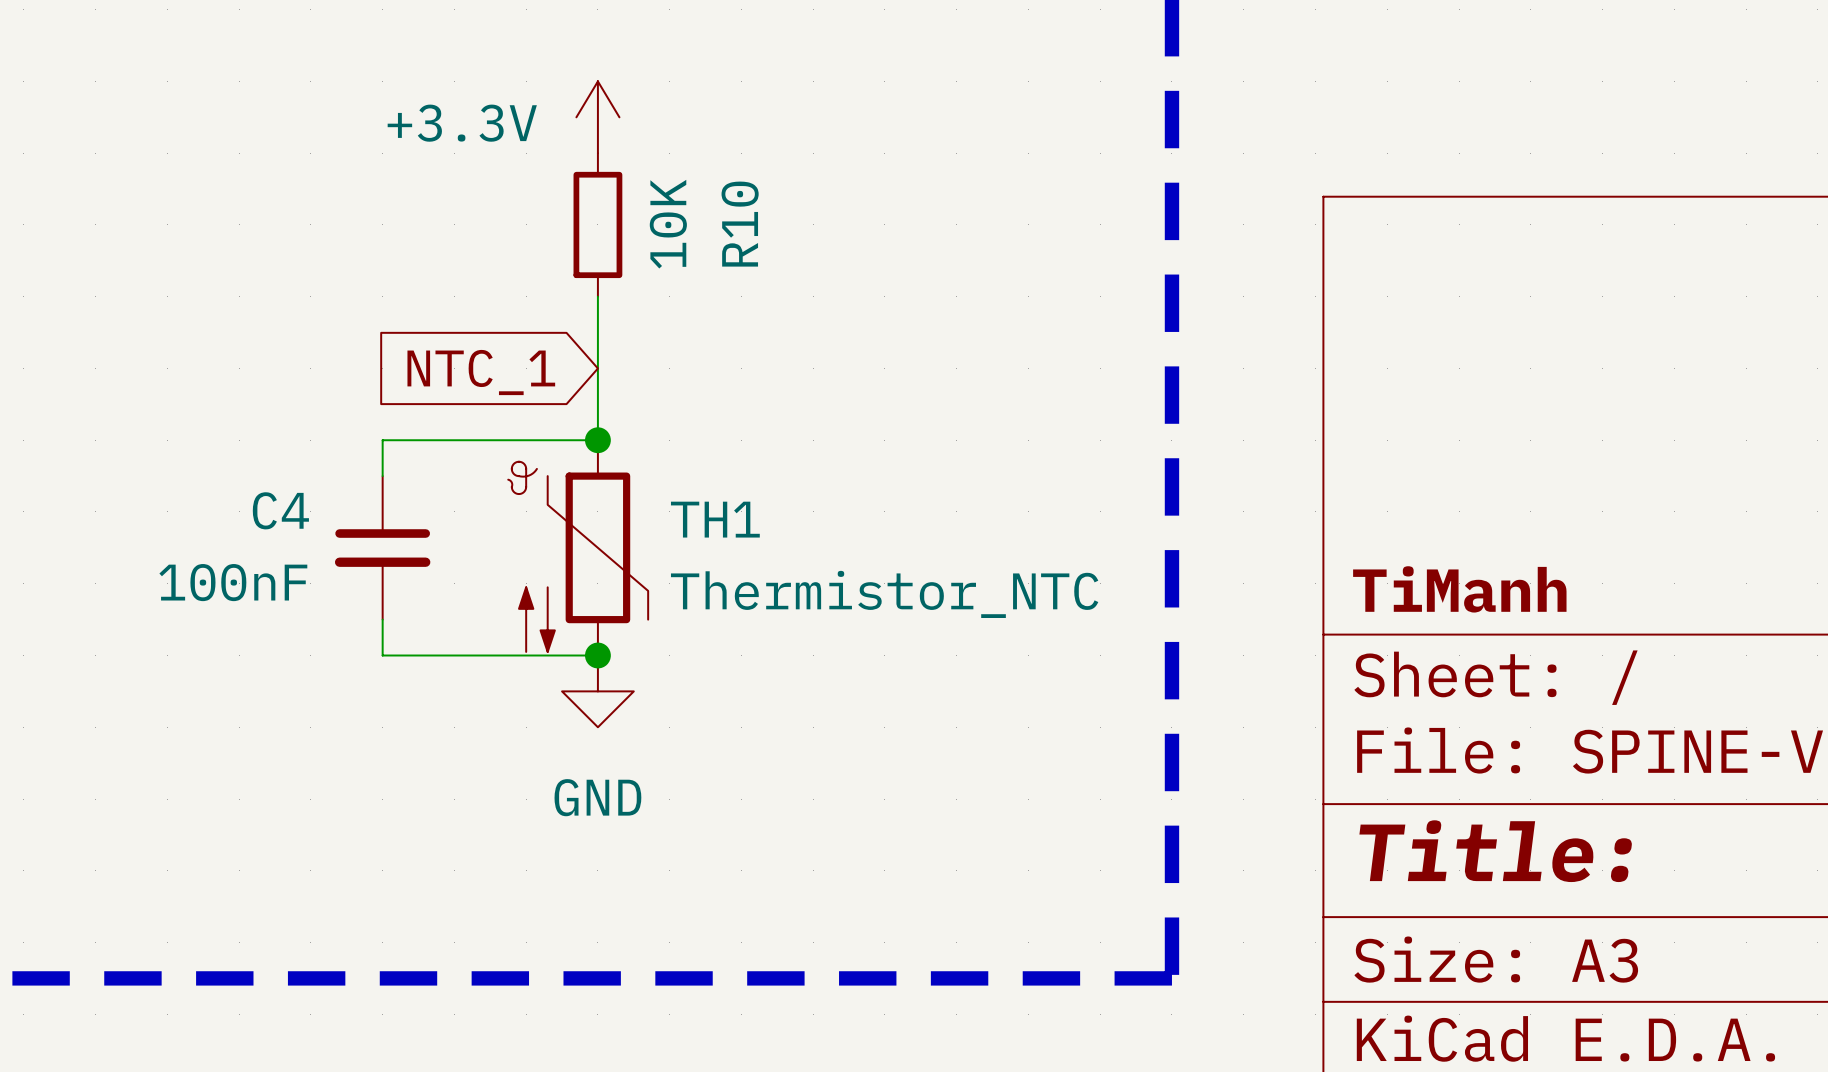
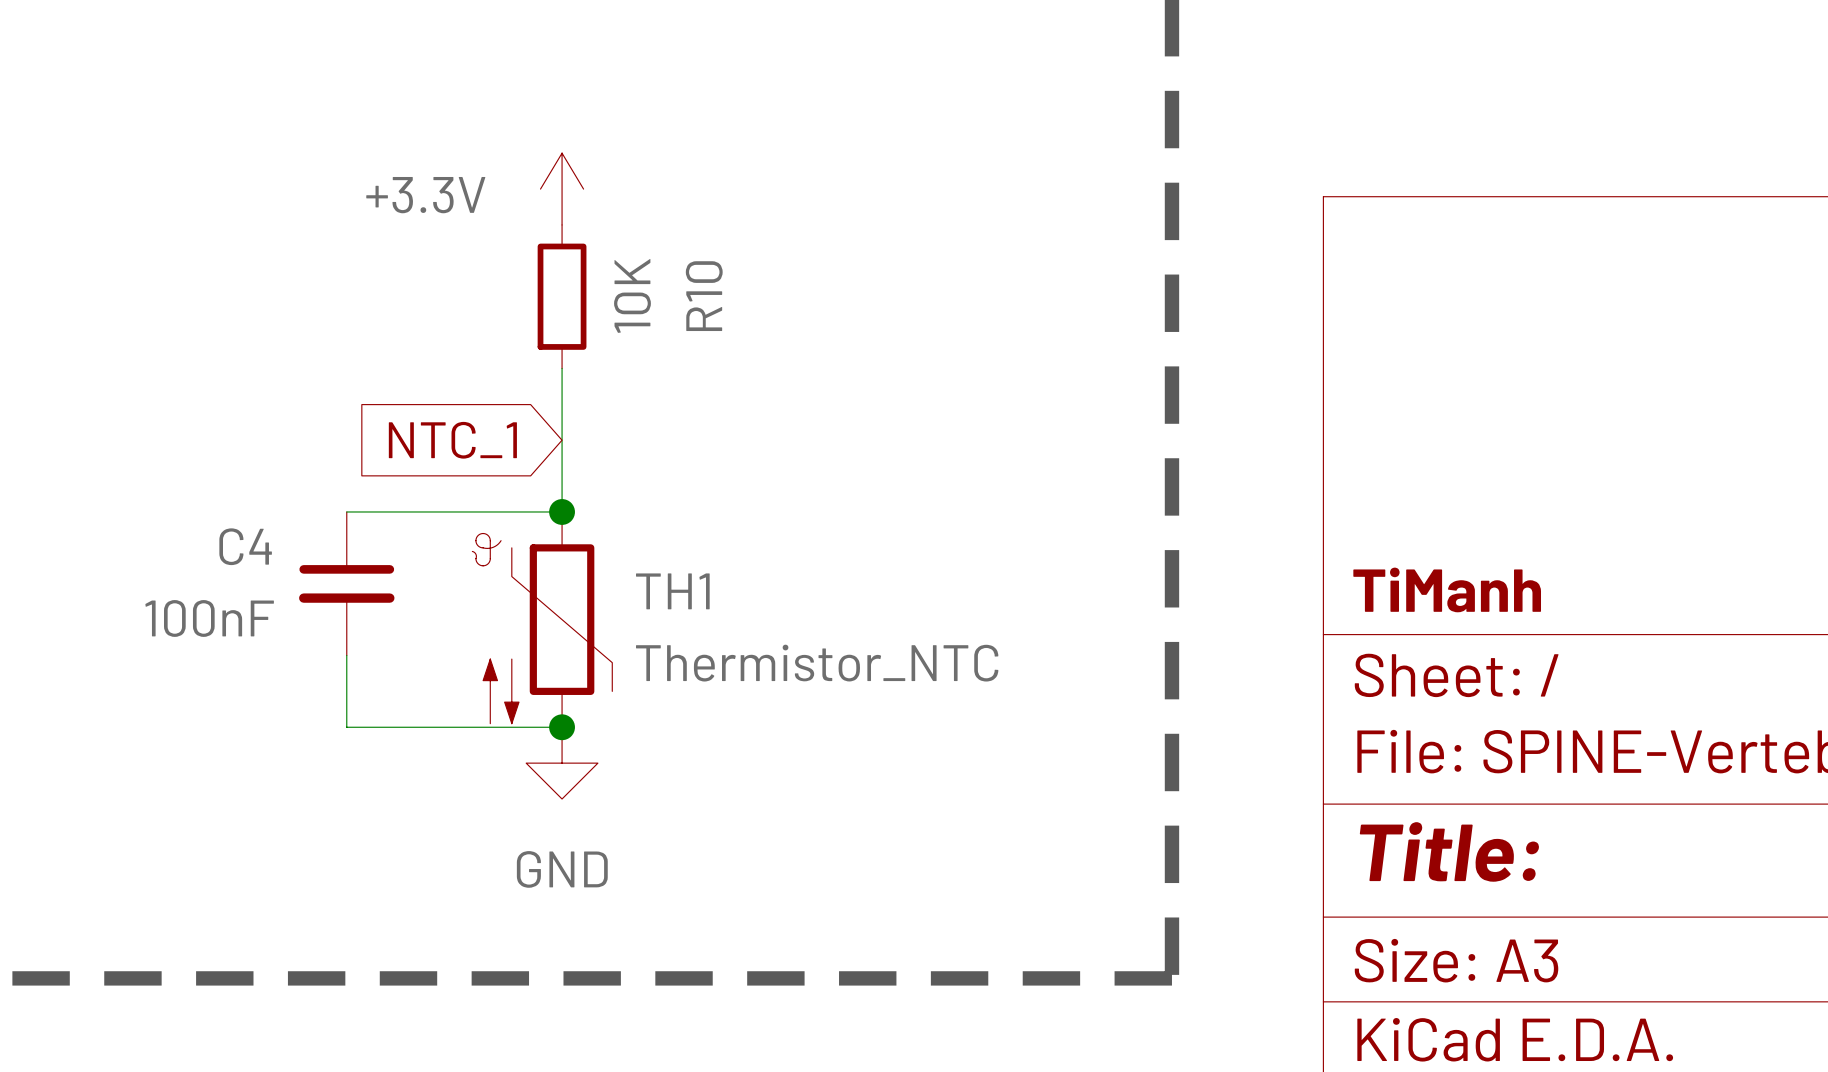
power symbol position: +3.3V (597, 117) -> +3.3V (562, 189)
R10 position: (597, 224) -> (562, 296)
wire: (597, 296) (597, 440) (382, 440) (382, 476) -> none
wire: none -> (562, 368) (562, 511) (346, 511)
global label position: NTC_1 (481, 372) -> NTC_1 (452, 440)
junction: (597, 440) -> none
junction: none -> (562, 511)
C4 position: (382, 547) -> (346, 583)
TH1 position: (578, 547) -> (542, 619)
wire: (382, 619) (382, 655) (597, 655) -> none
wire: none -> (346, 655) (346, 727) (562, 727)
junction: (597, 655) -> none
power symbol position: GND (597, 691) -> GND (562, 763)
junction: none -> (562, 727)

